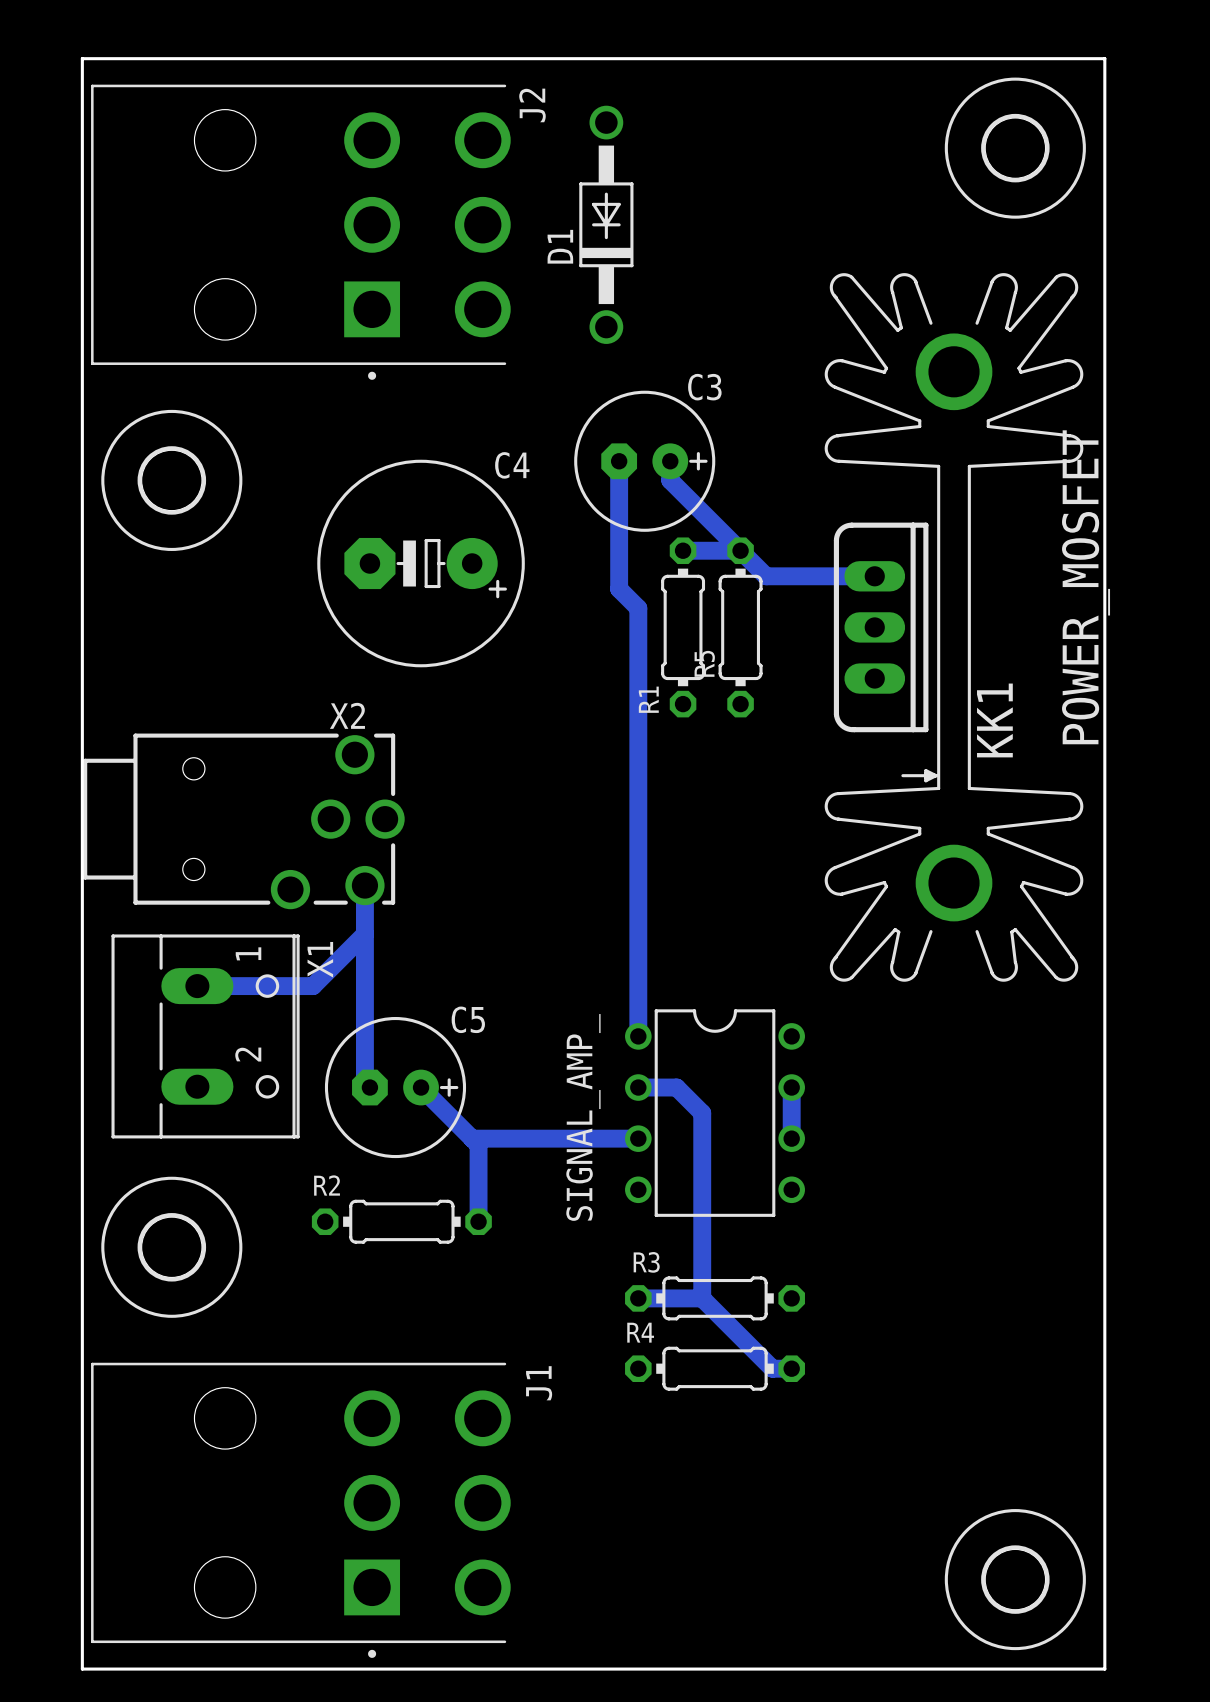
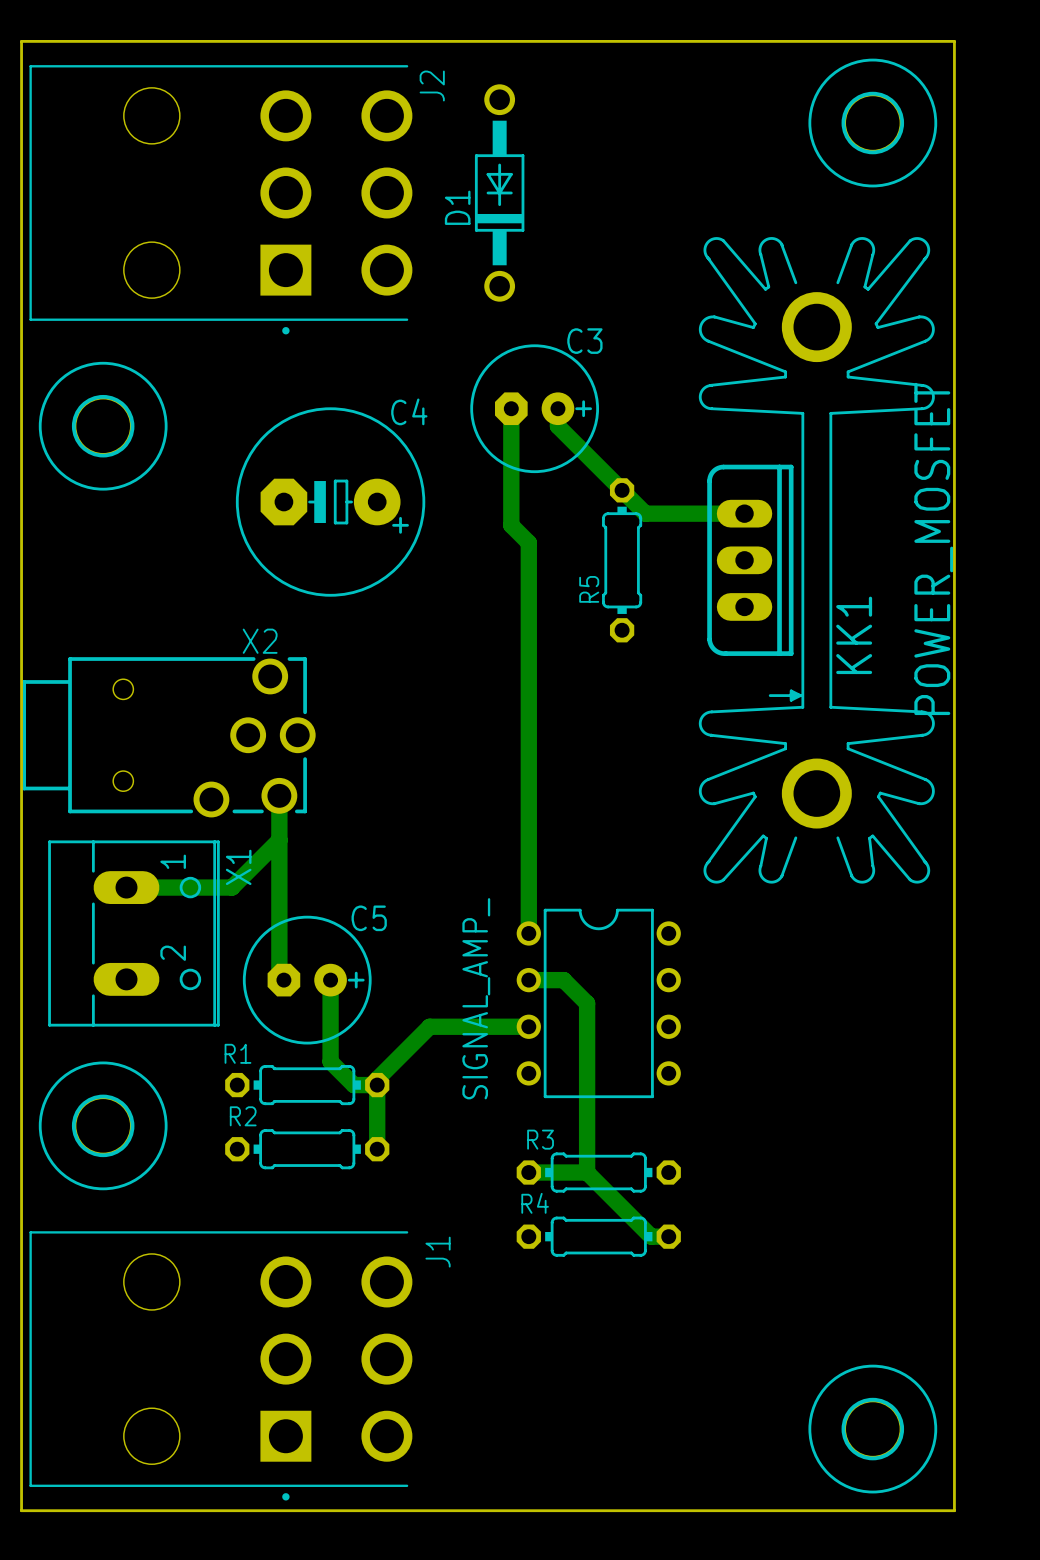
bottom track: (683, 550) (740, 550) -> none
R1 rotation: 0° (683, 627) -> 90° clockwise (307, 1085)
R1 position: (683, 627) -> (307, 1085)
bottom track: (421, 1087) (478, 1145) (478, 1221) -> (330, 980) (330, 1061) (353, 1085) (377, 1085)
bottom track: (791, 1087) (791, 1138) -> none
bottom track: (472, 1138) (529, 1138) -> (377, 1149) (377, 1079) (429, 1026)
R2 position: (401, 1221) -> (307, 1149)

